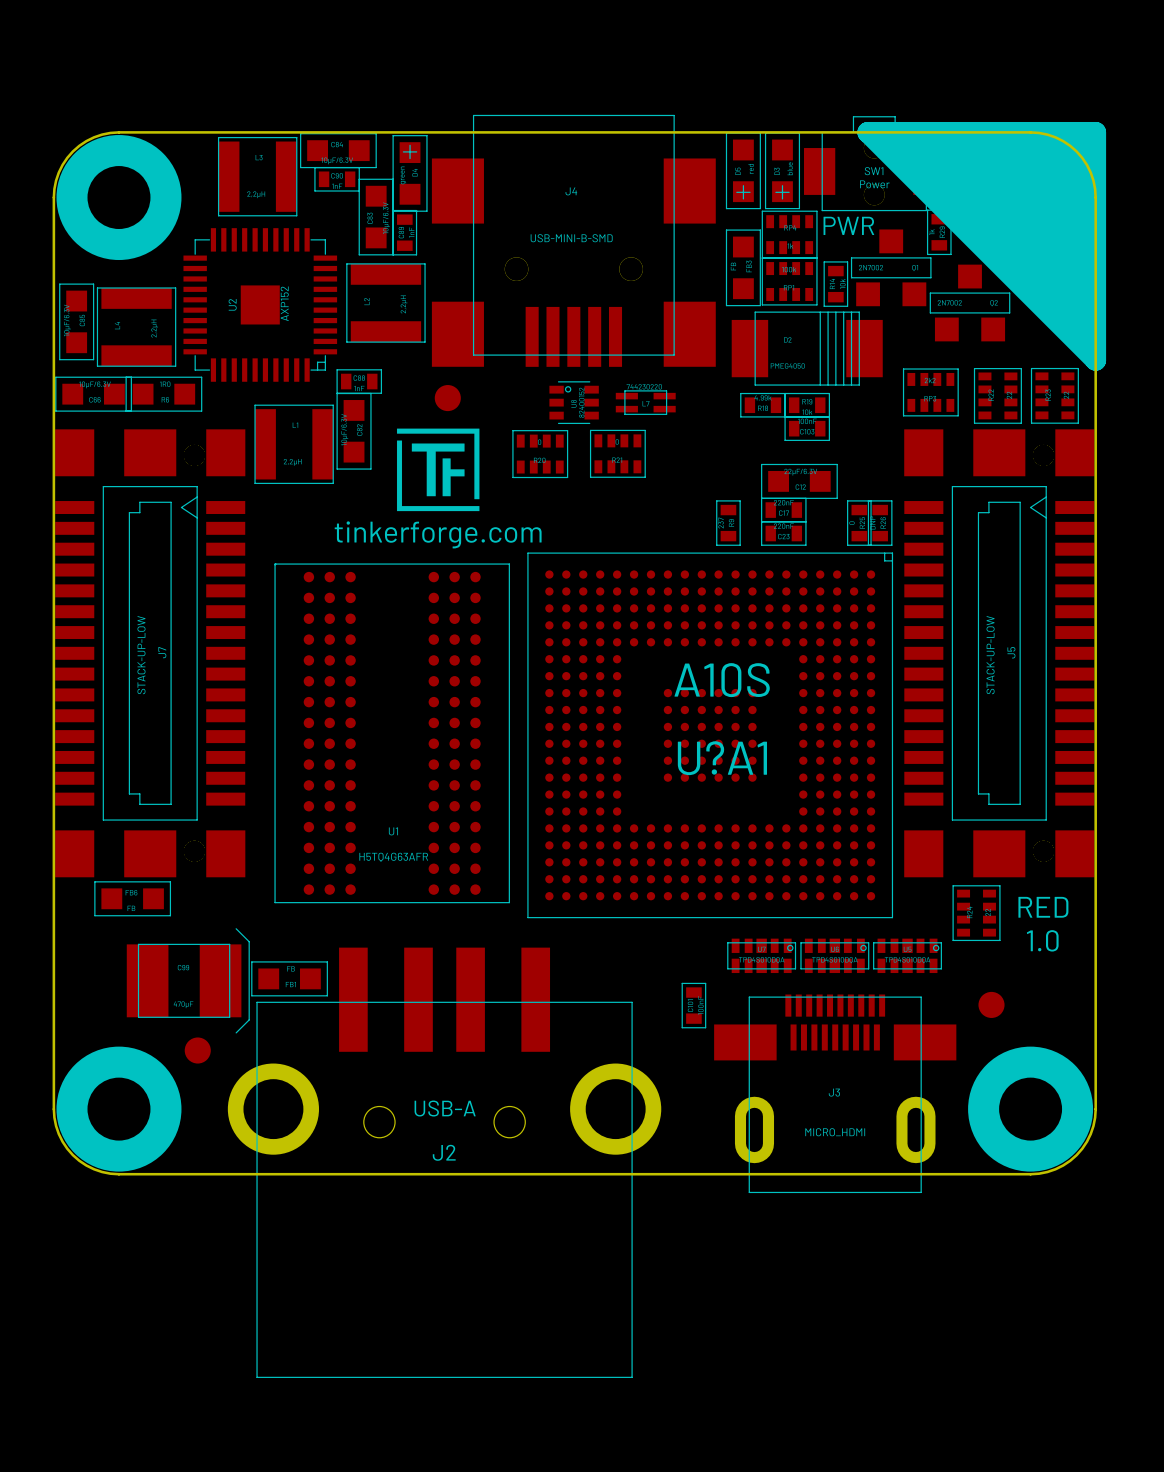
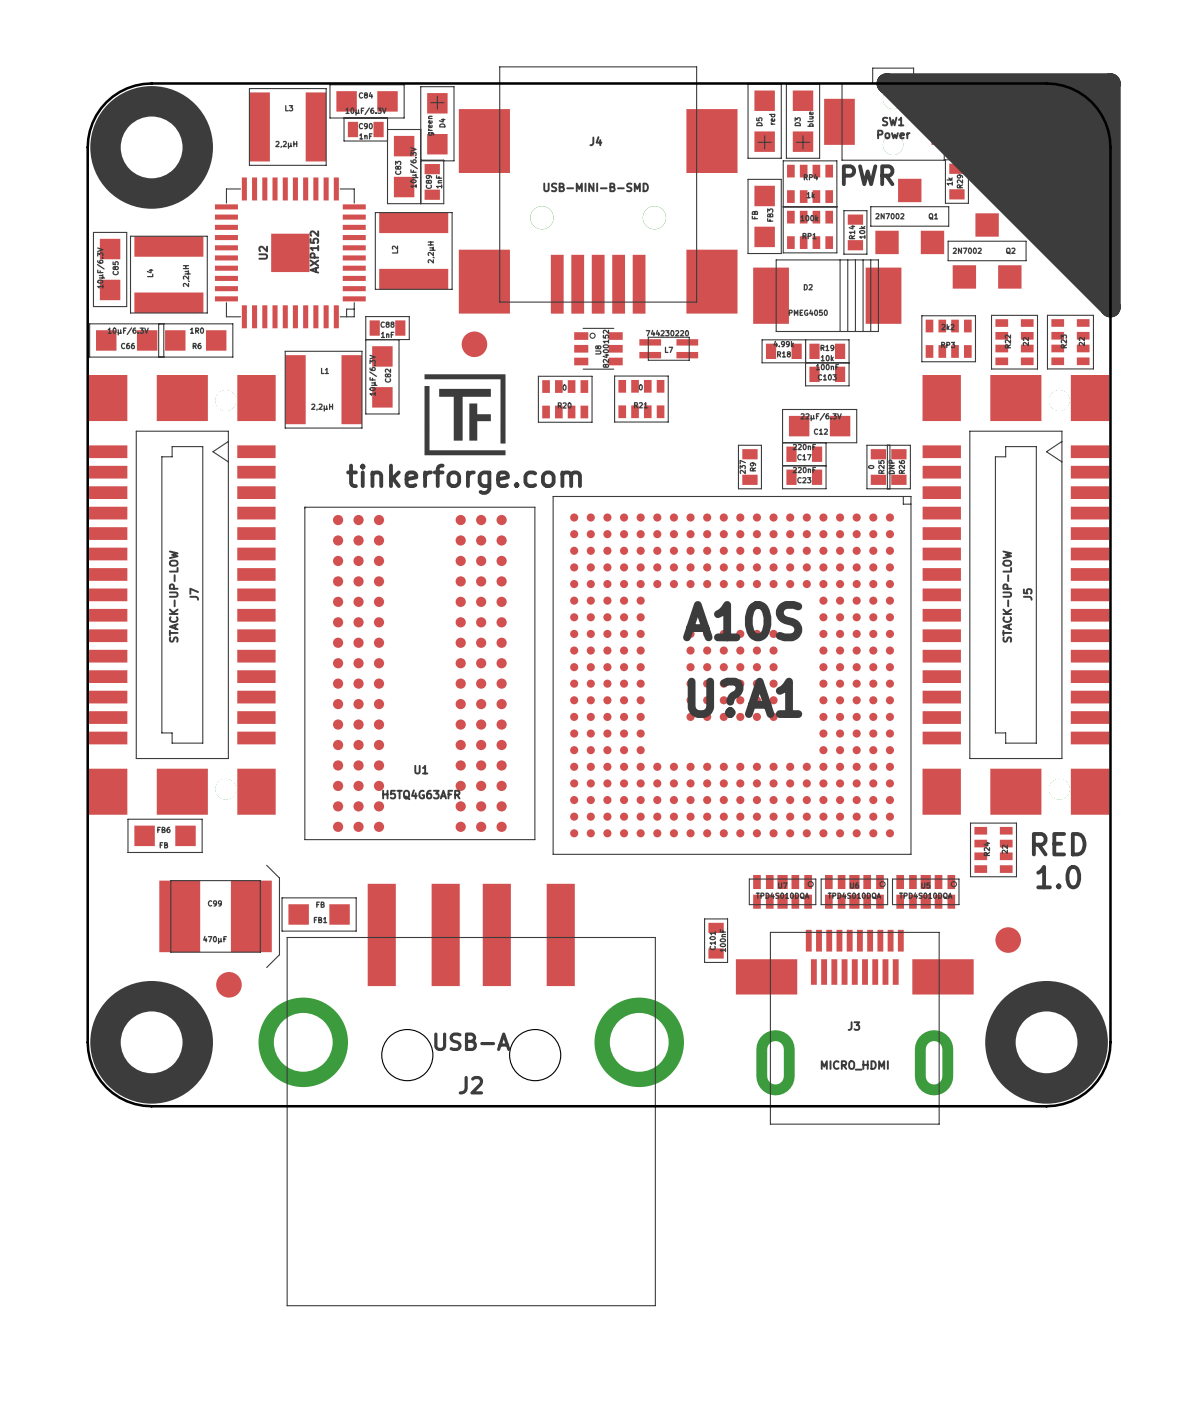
J2 footprint: [227, 947, 662, 1378] -> [258, 883, 684, 1306]

